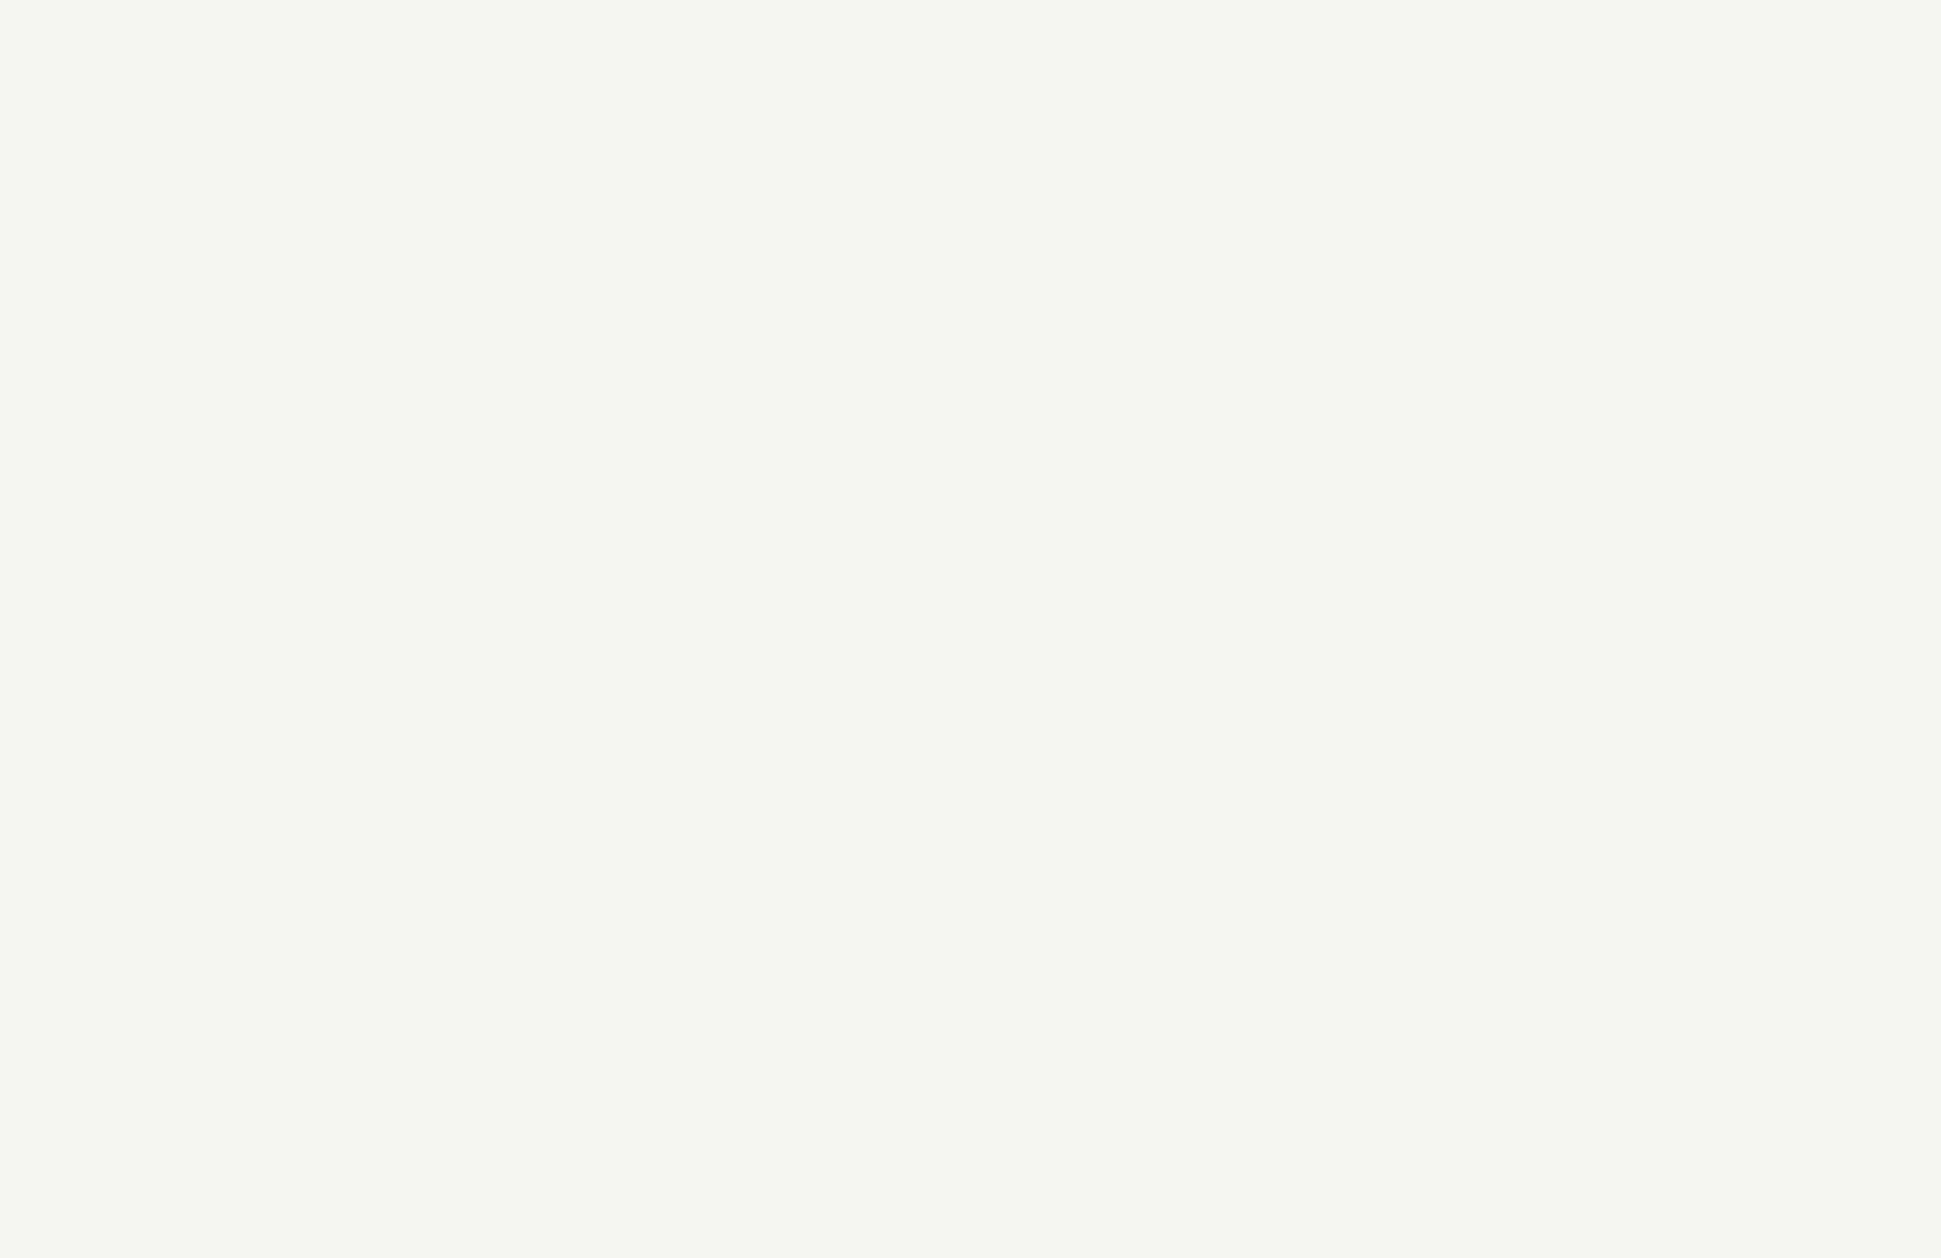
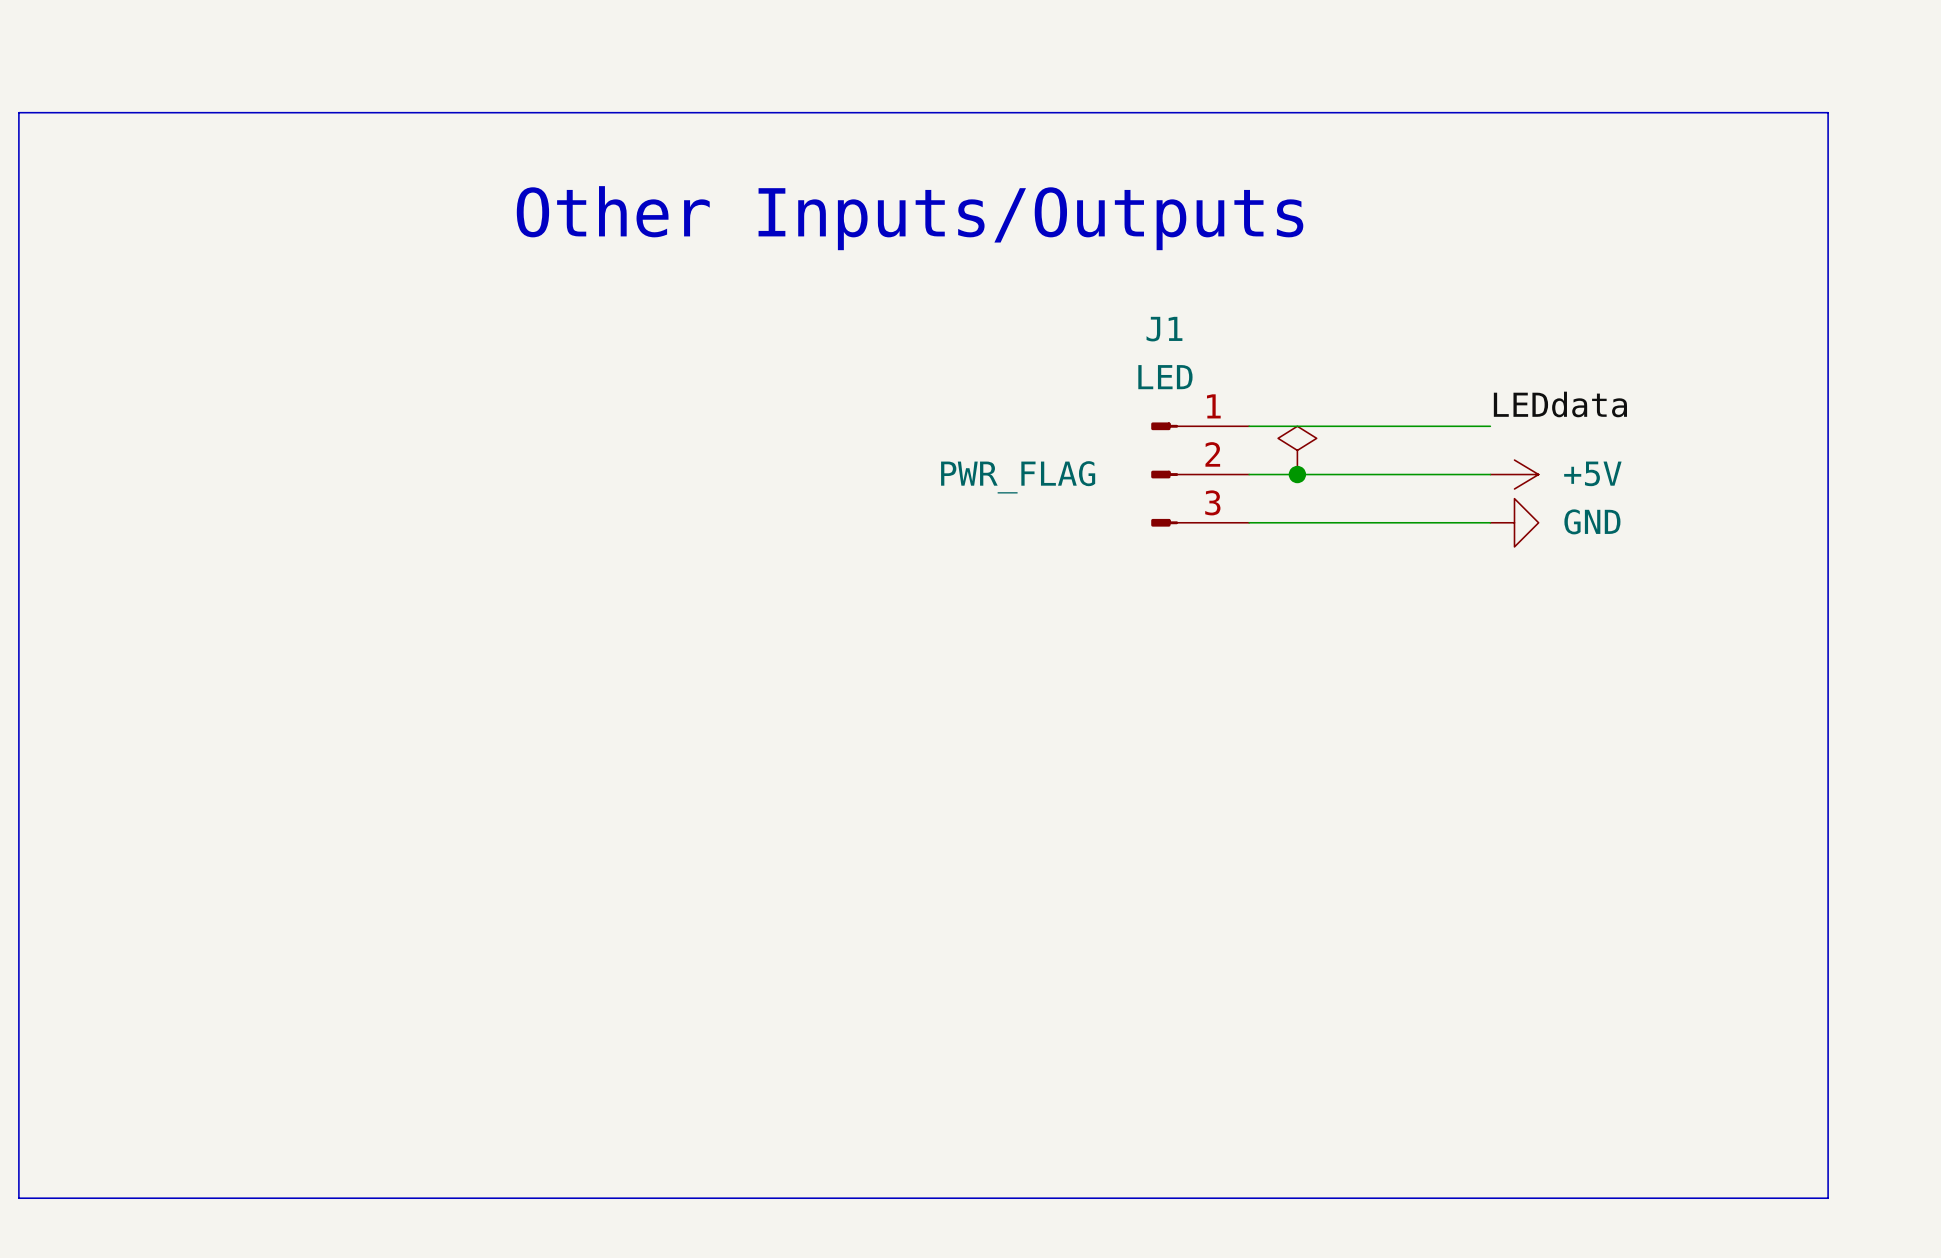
line: none -> (18, 112) (1828, 112) (1828, 1198) (18, 1198) (18, 112)
text: none -> Other Inputs/Outputs (910, 218)
label: none -> LEDdata (1560, 404)
wire: none -> (1249, 426) (1490, 426)
power symbol: none -> PWR_FLAG (1297, 450)
J1: none -> LED (1200, 474)
wire: none -> (1249, 474) (1490, 474)
junction: none -> (1297, 474)
power symbol: none -> +5V (1514, 474)
wire: none -> (1249, 522) (1490, 522)
power symbol: none -> GND (1514, 522)

